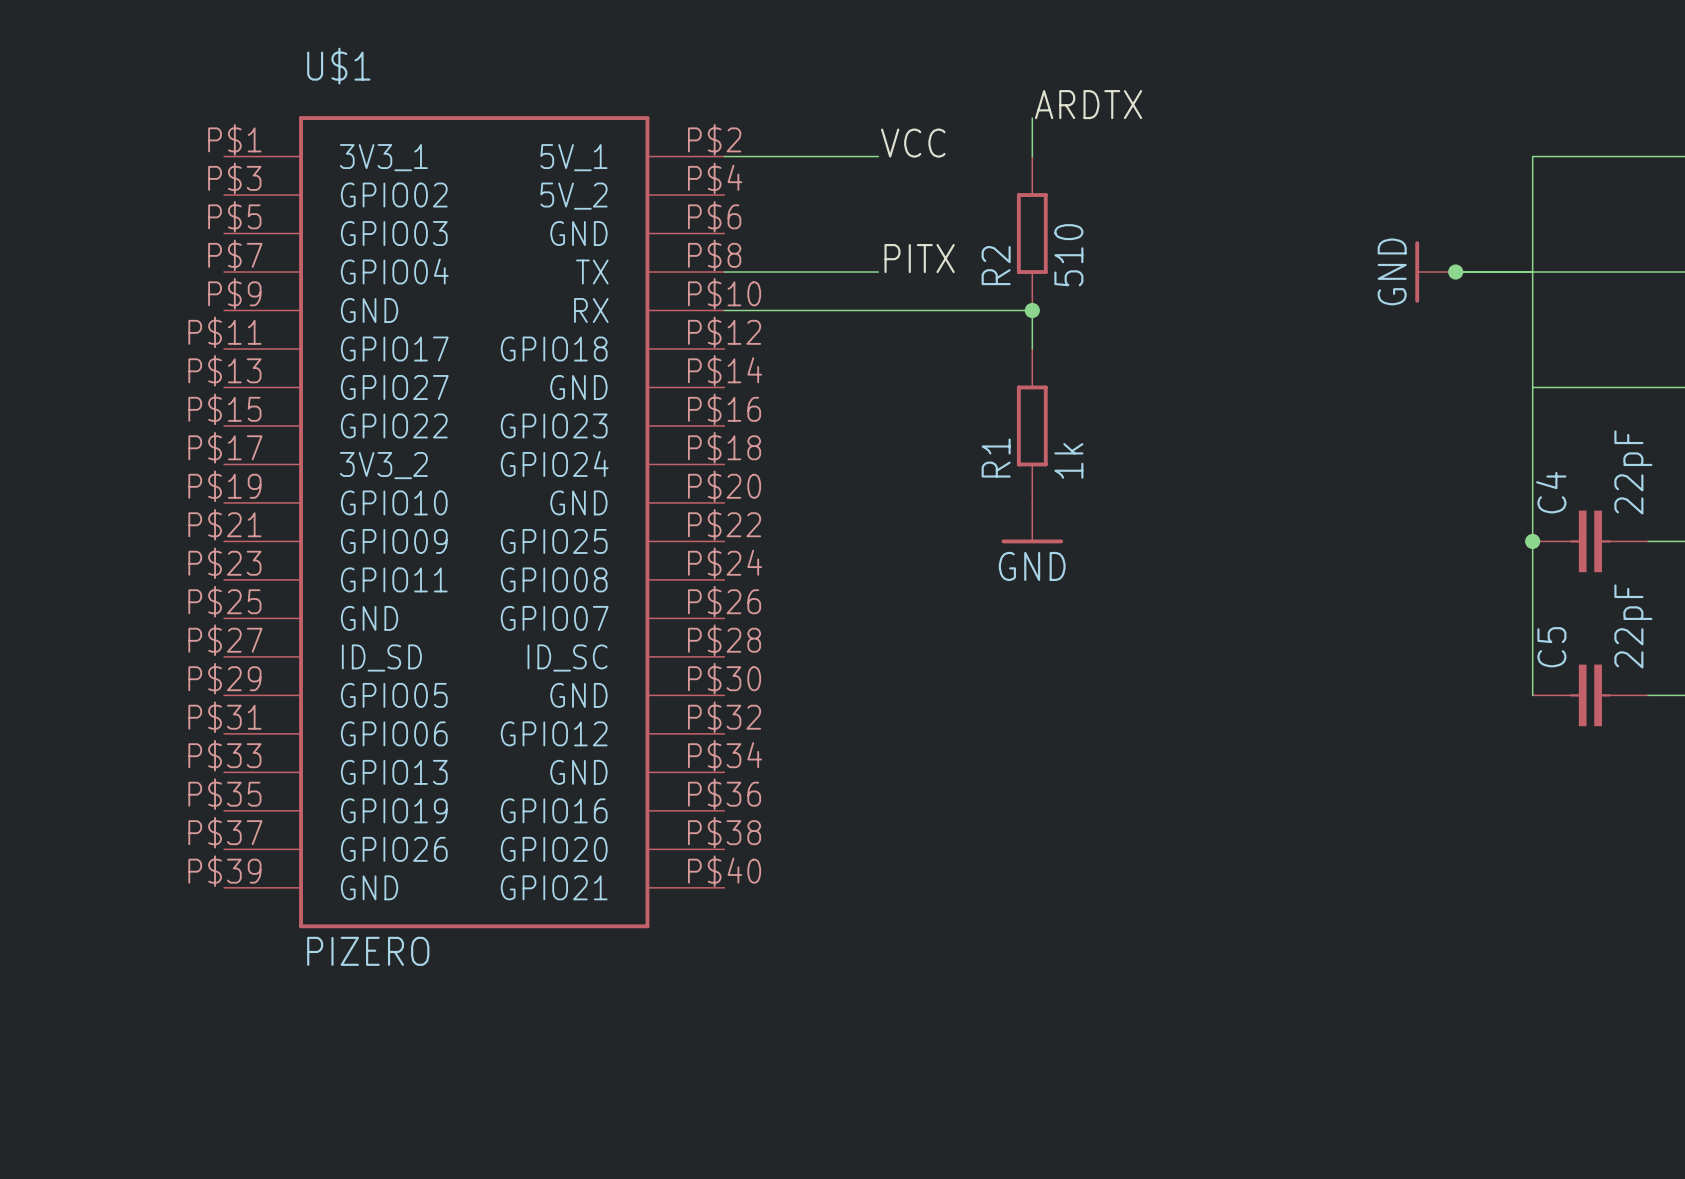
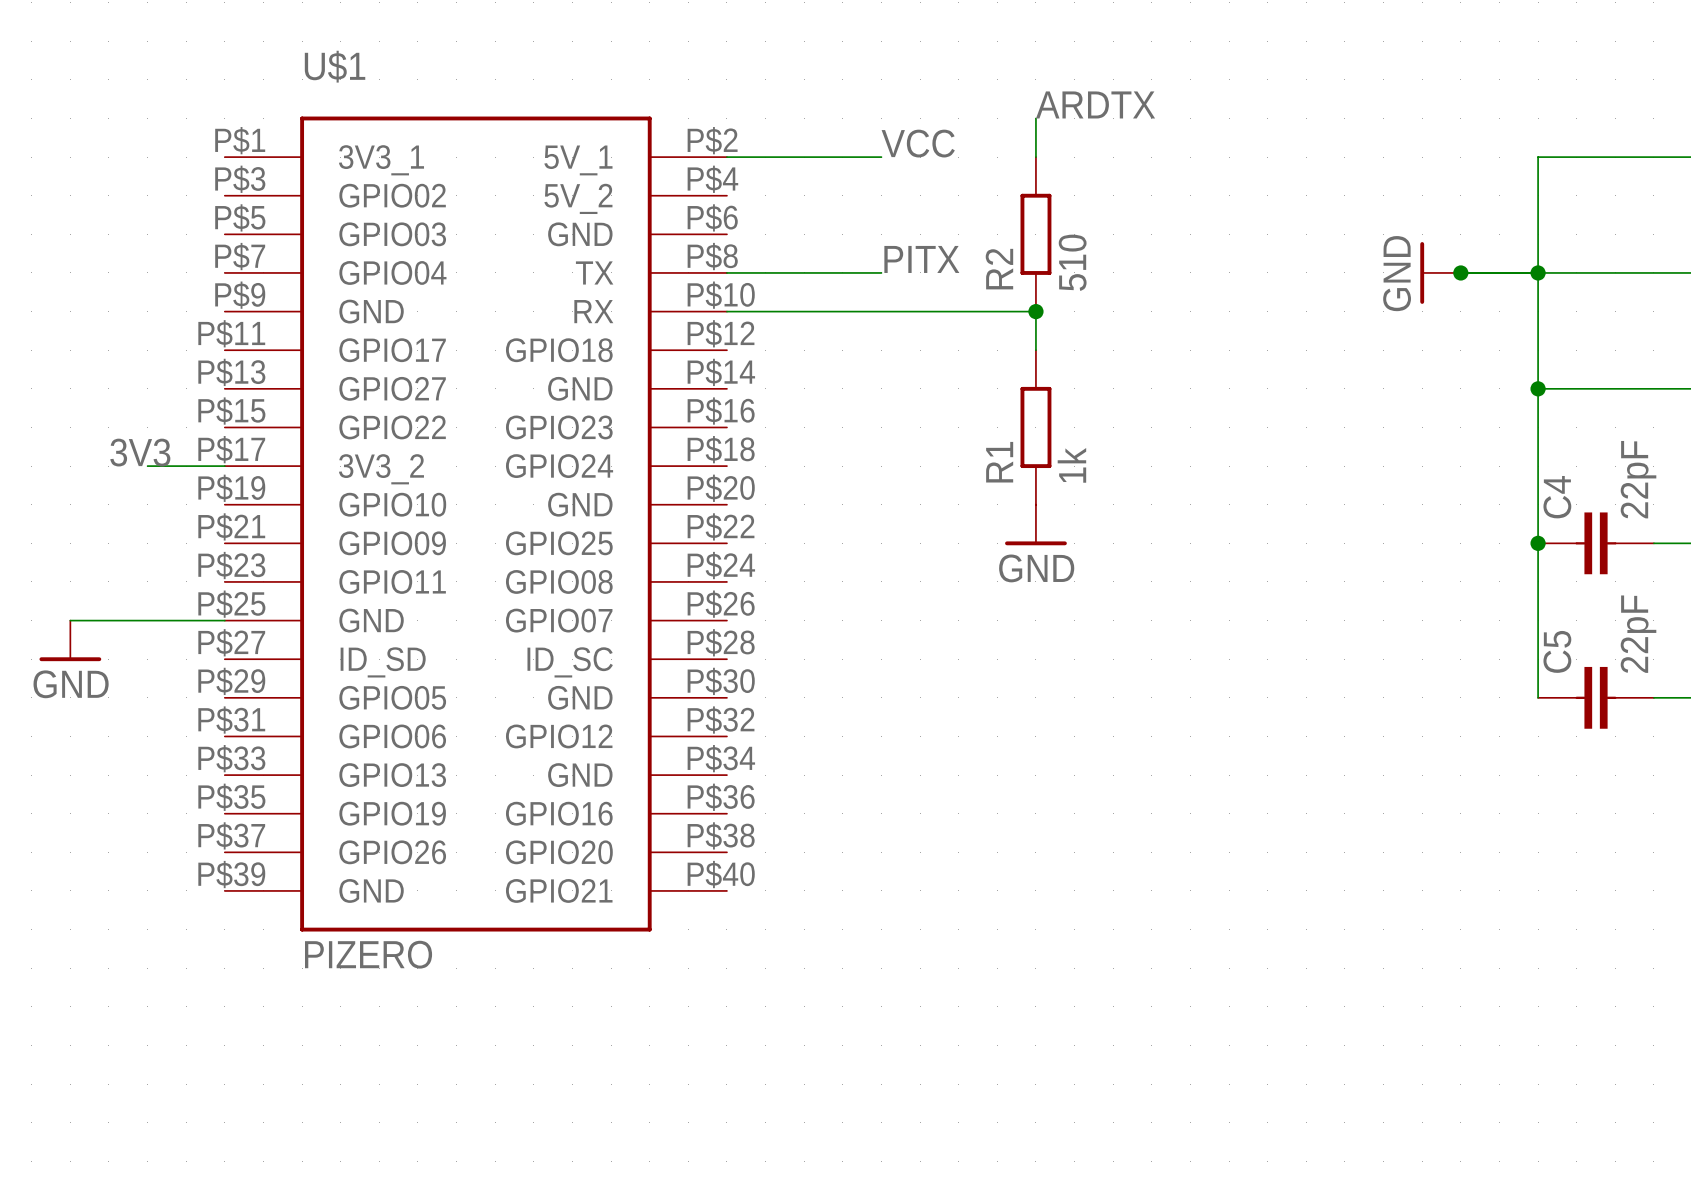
junction: none -> (1538, 272)
junction: none -> (1538, 388)
label: none -> 3V3 (140, 452)
wire: none -> (147, 466) (224, 466)
wire: none -> (70, 620) (224, 620)
power symbol: none -> GND (70, 640)

